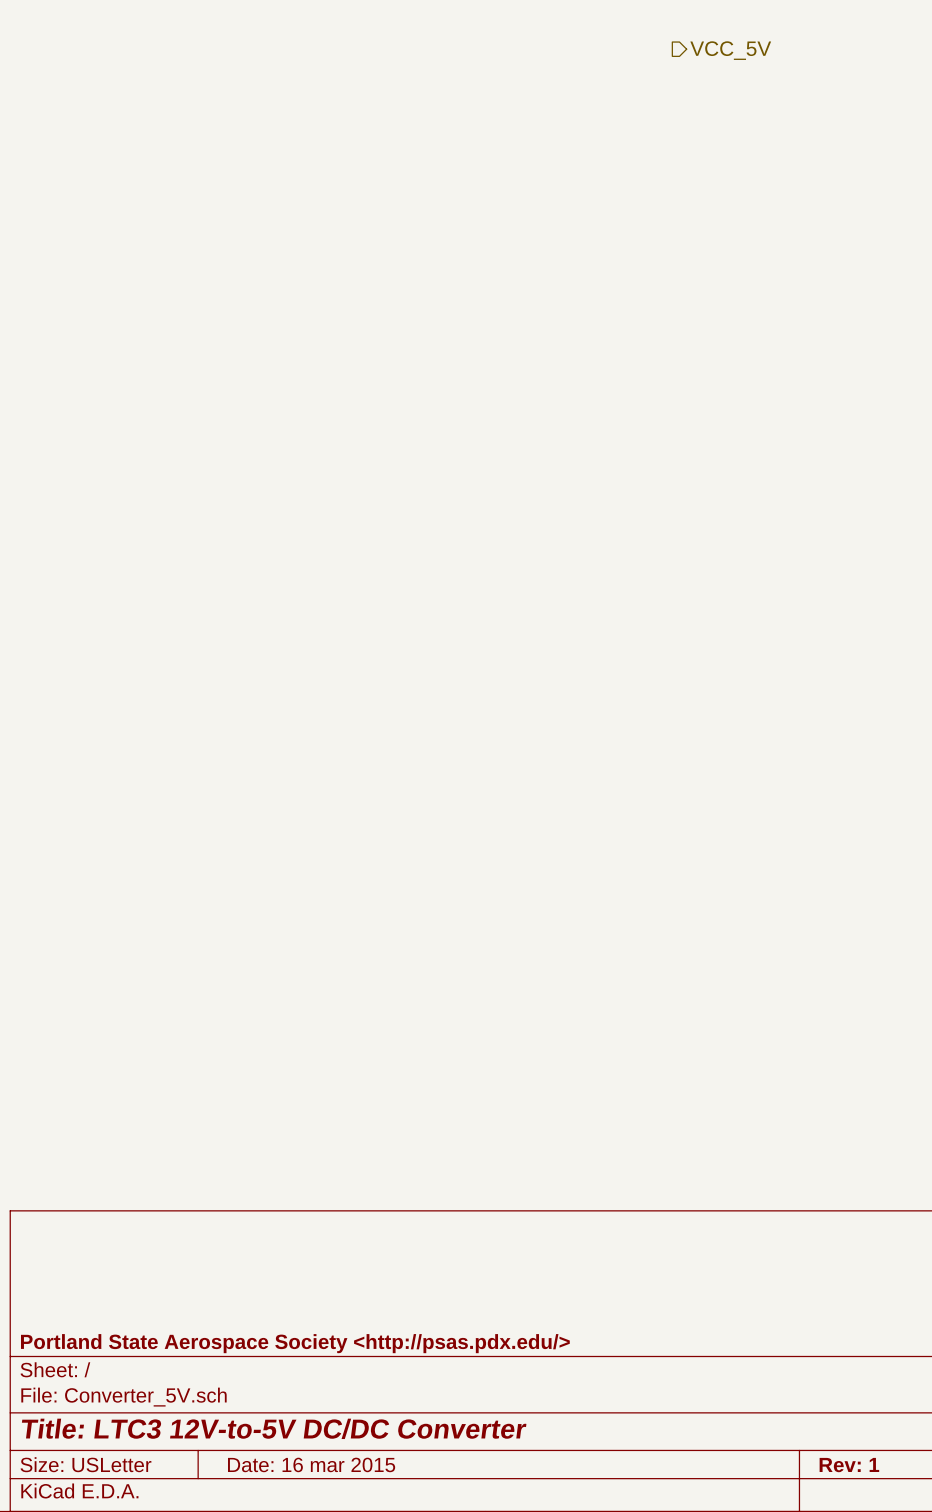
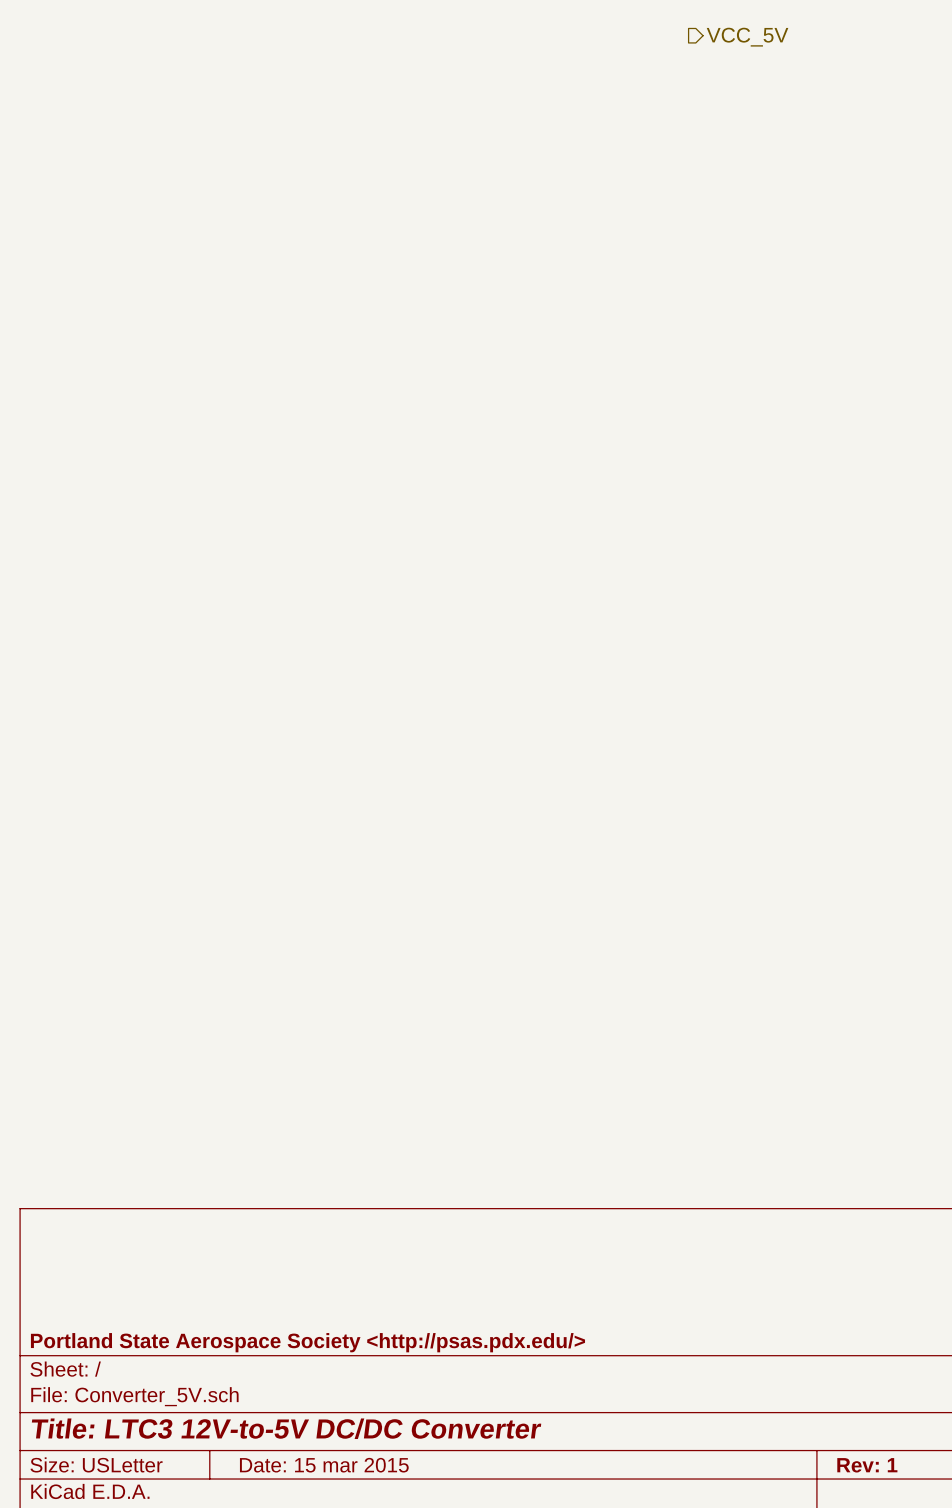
title block: Date: 16 mar 2015 (311, 1464) -> Date: 15 mar 2015 (324, 1465)

